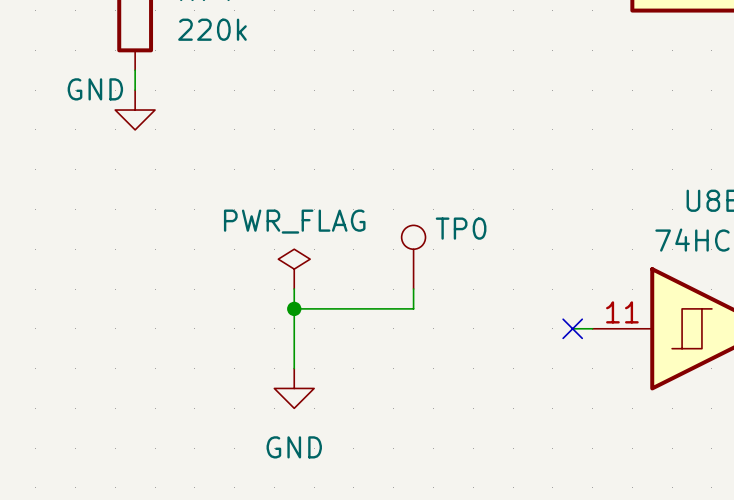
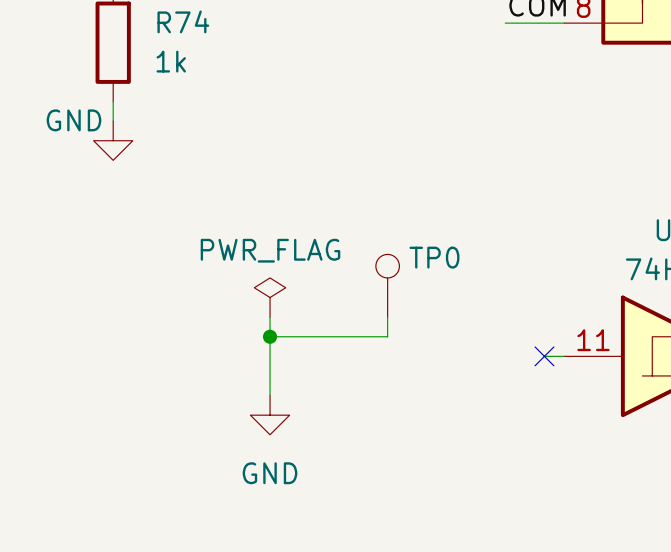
R74 value: 220k (212, 29) -> 1k (171, 61)

